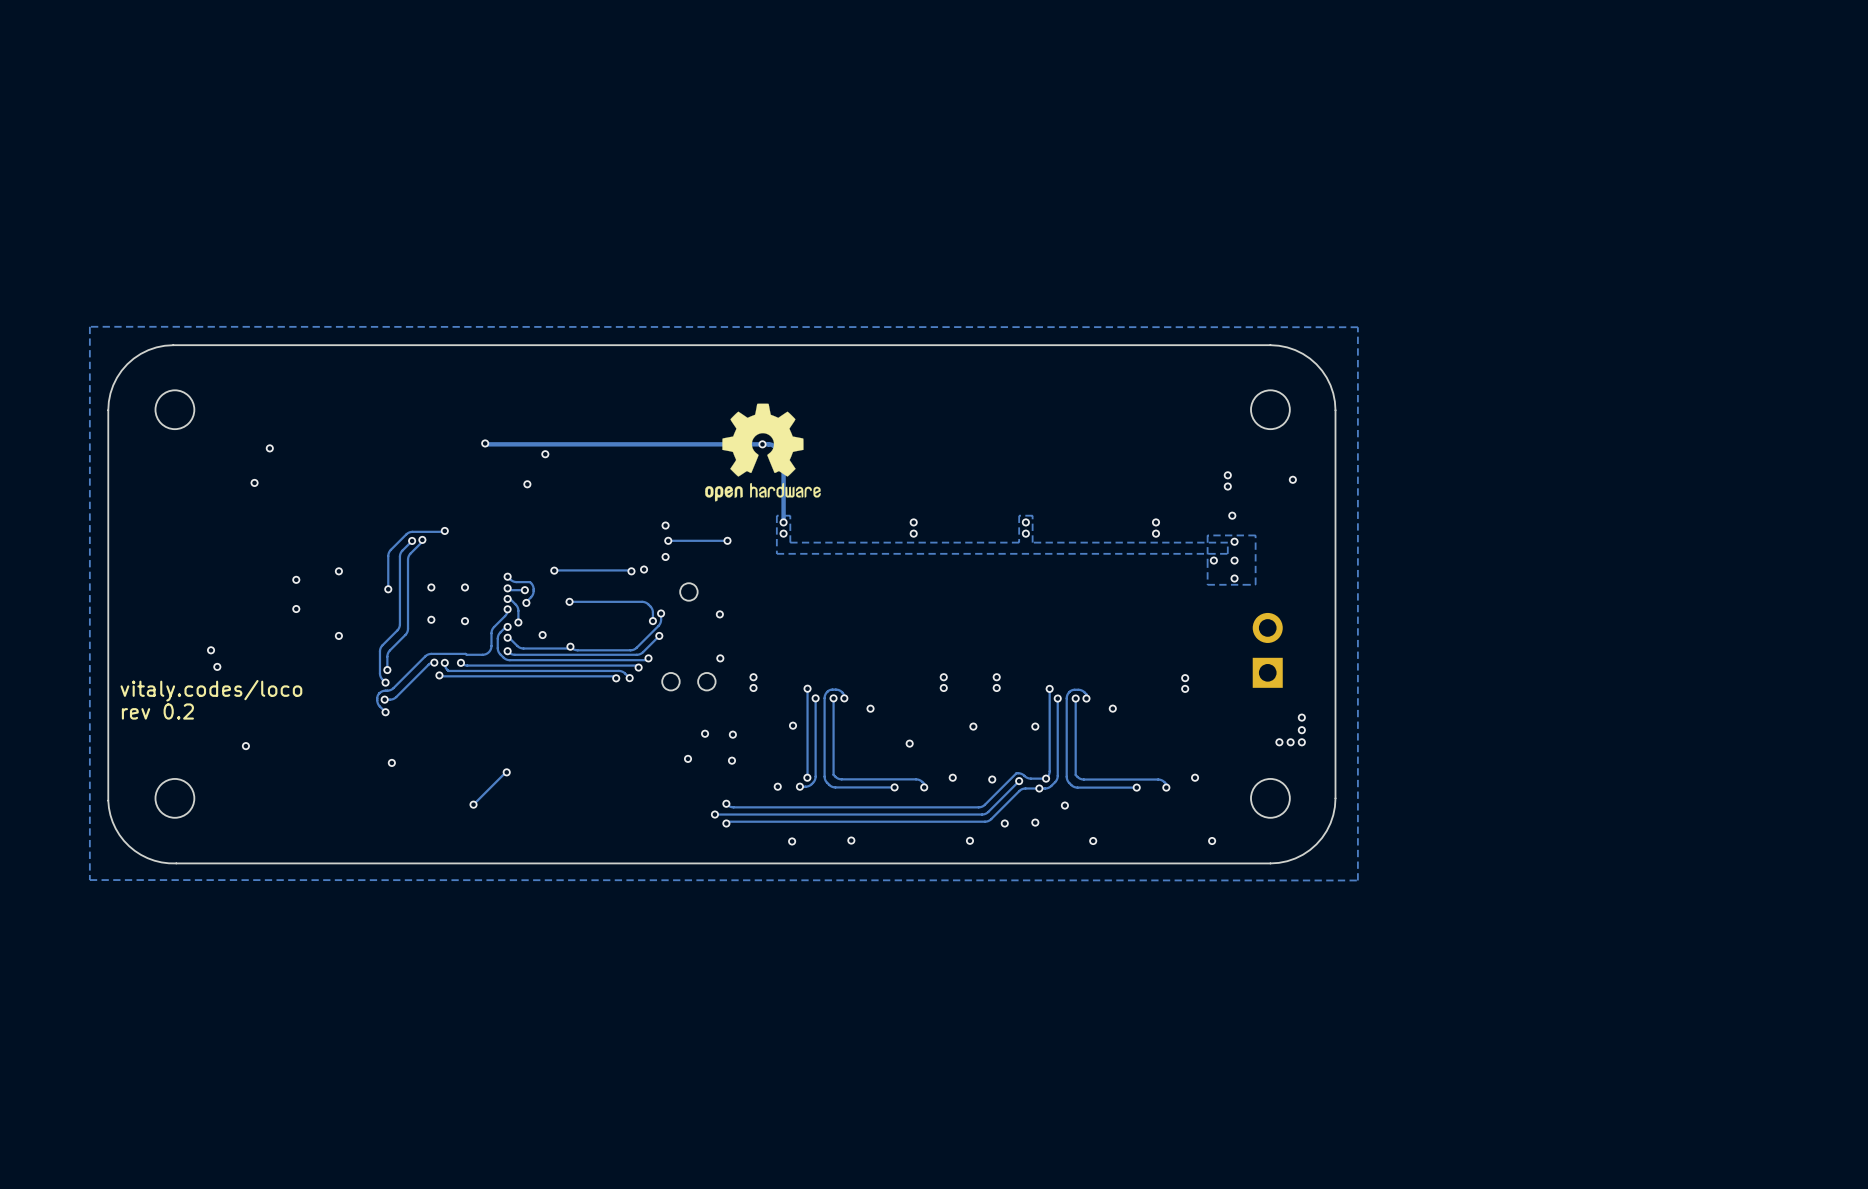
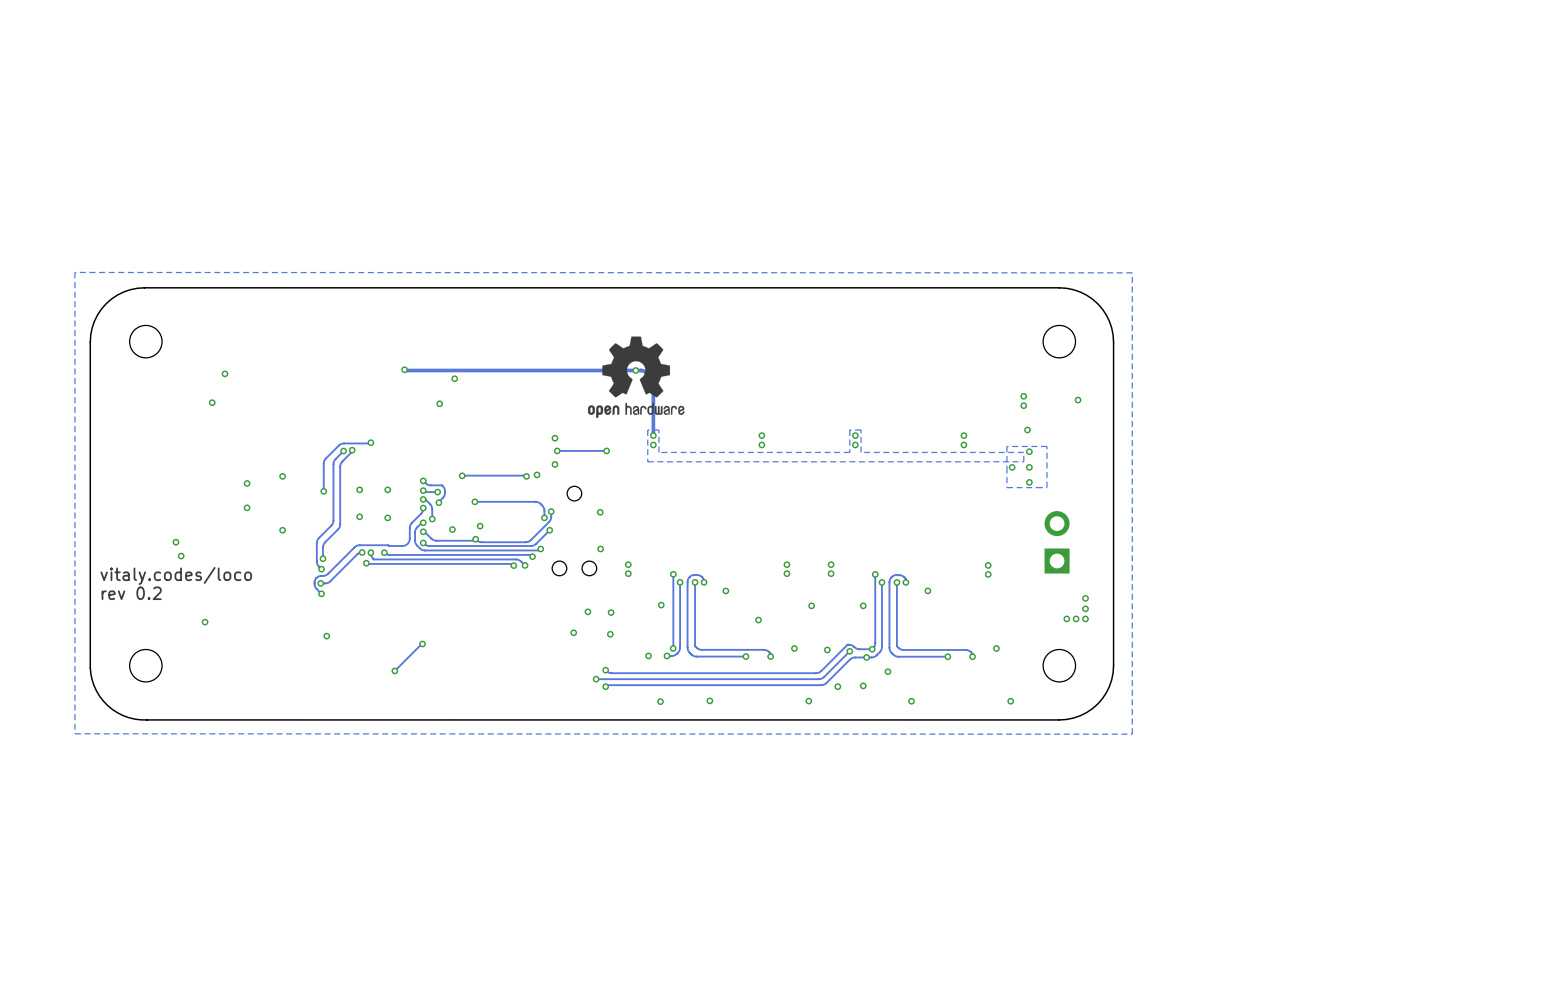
via: none -> (480, 526)

